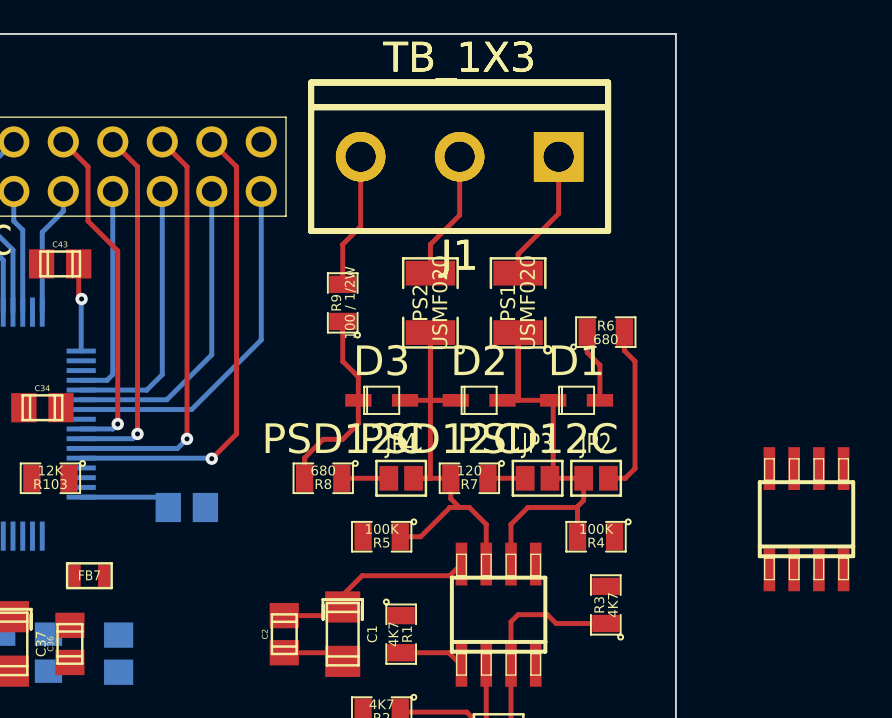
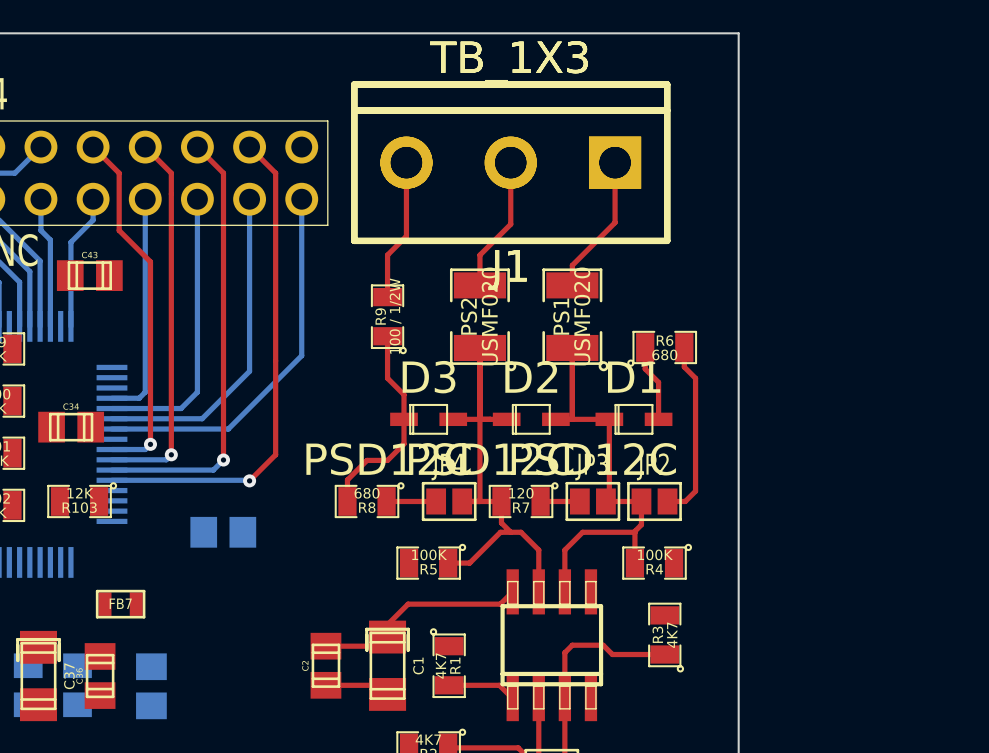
top track: (78, 263) (78, 296) (81, 298) -> none
bottom track: (81, 298) (81, 351) -> none
via: (81, 298) -> none
bottom track: (81, 497) (157, 497) (168, 507) -> none
part: (806, 519) -> none

